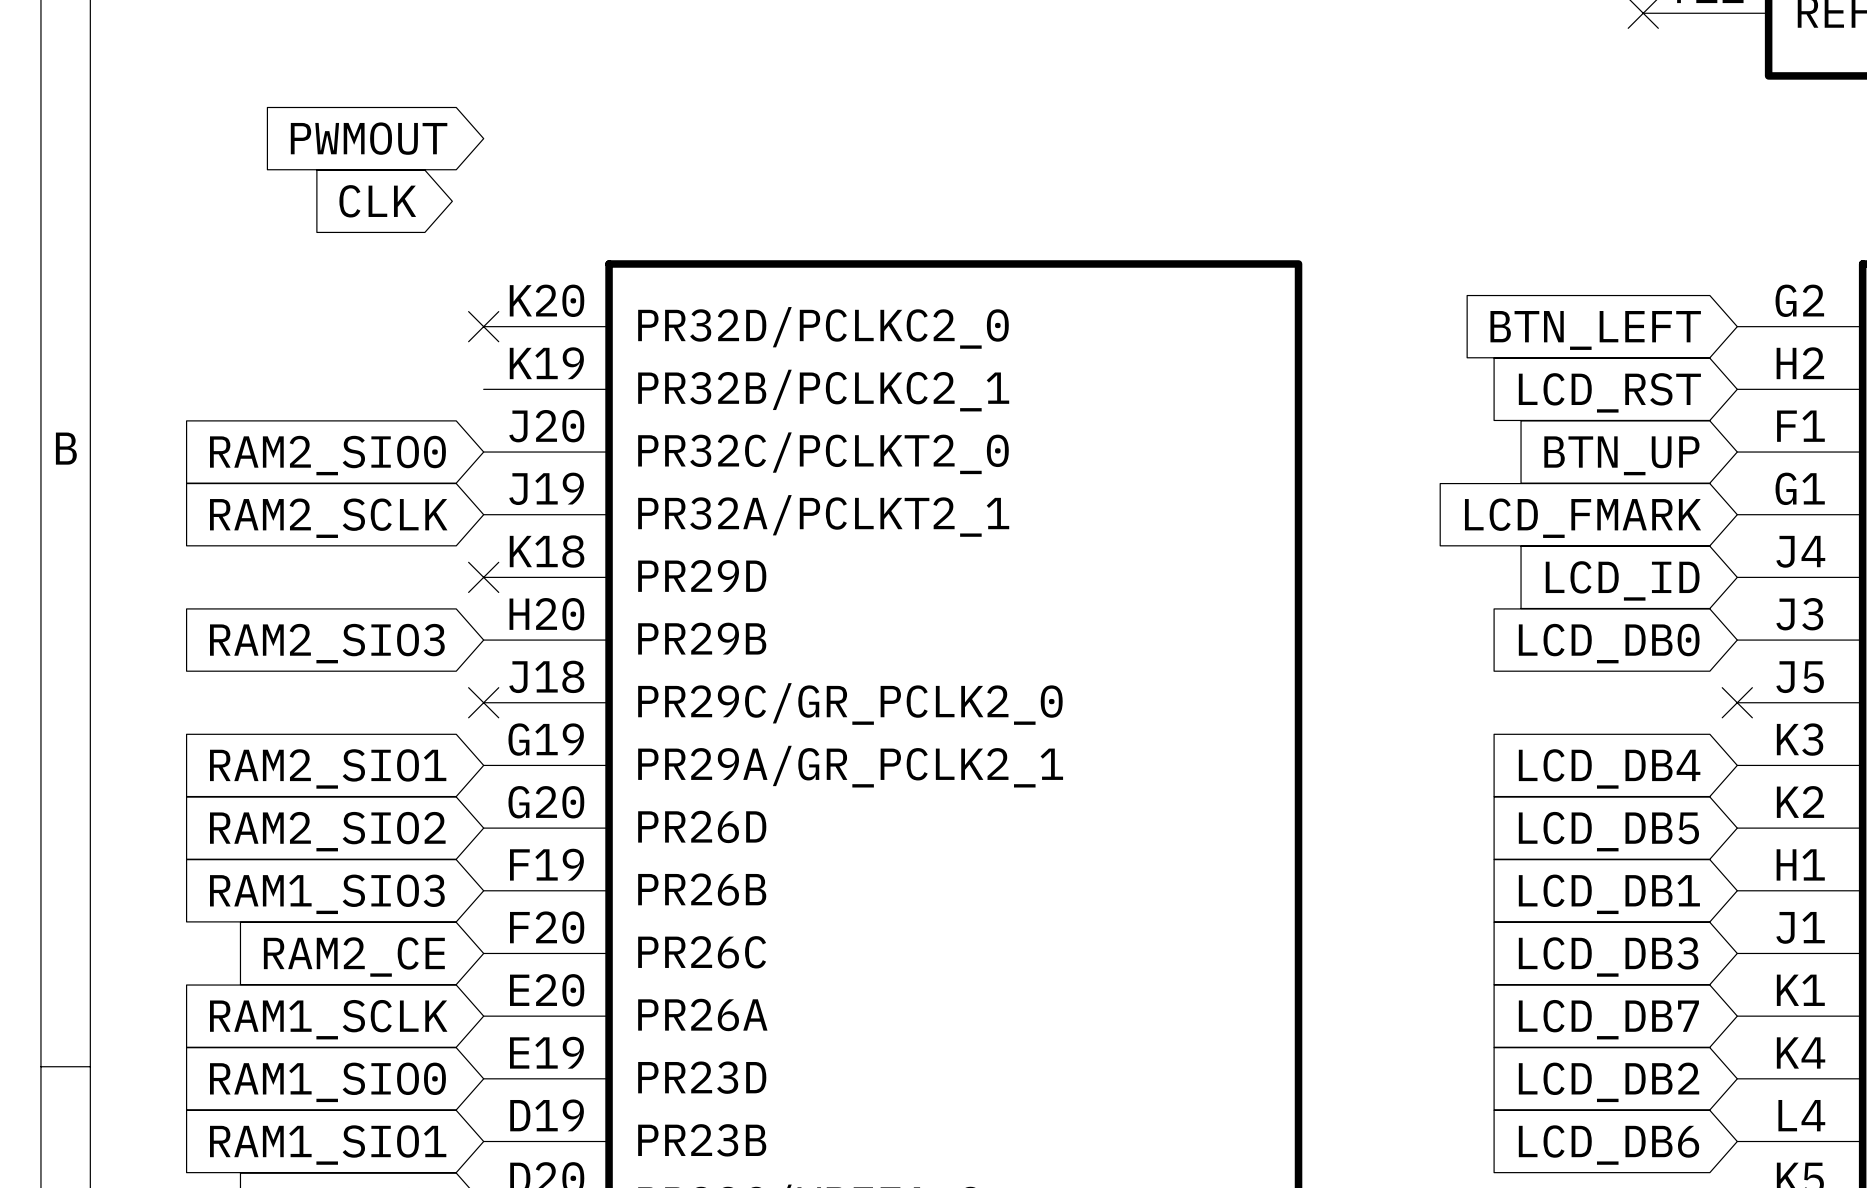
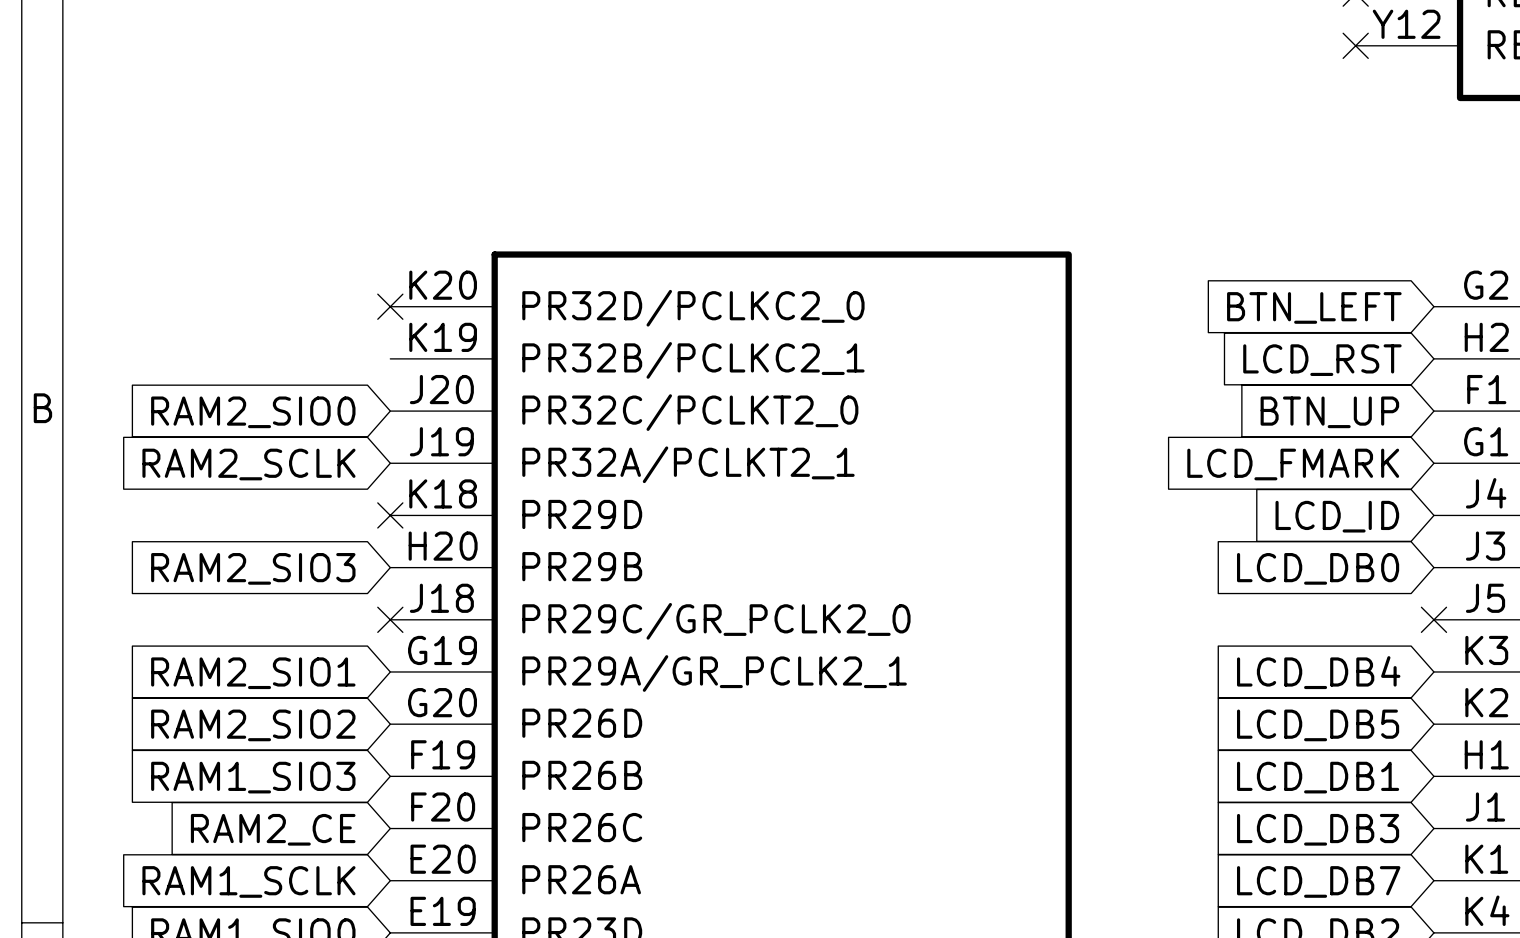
global label: PWMOUT (369, 138) -> none
global label: CLK (377, 201) -> none

